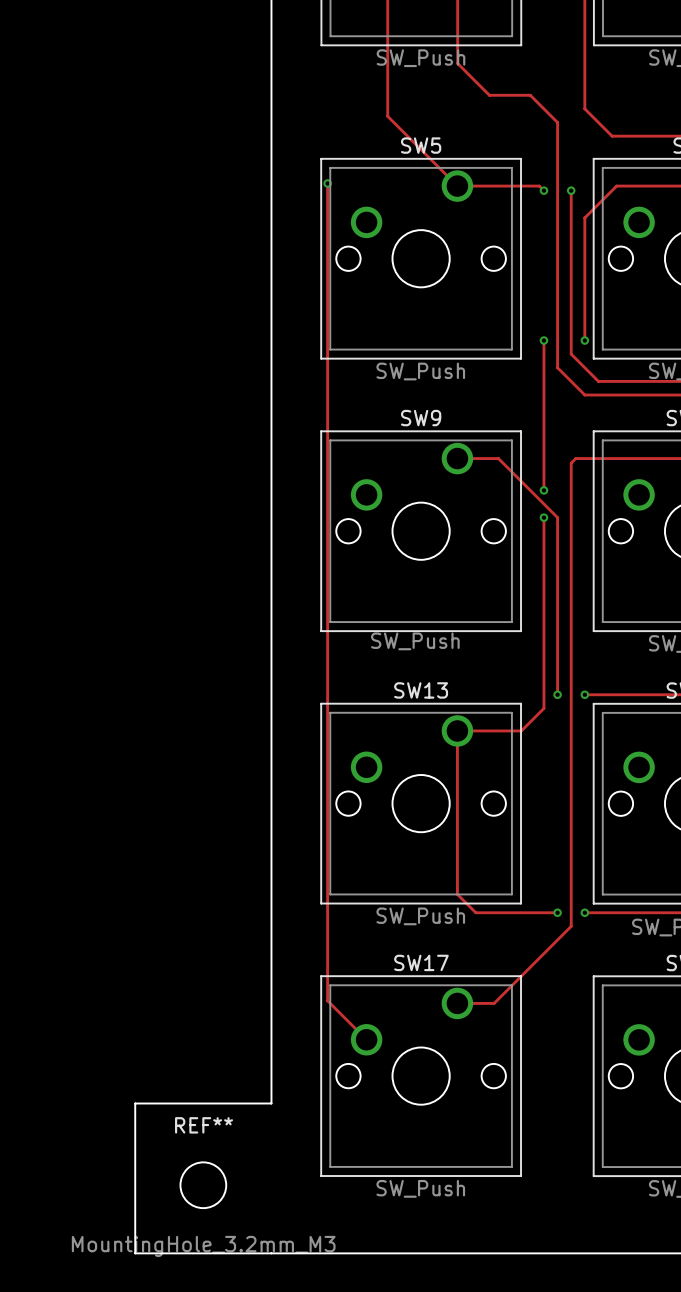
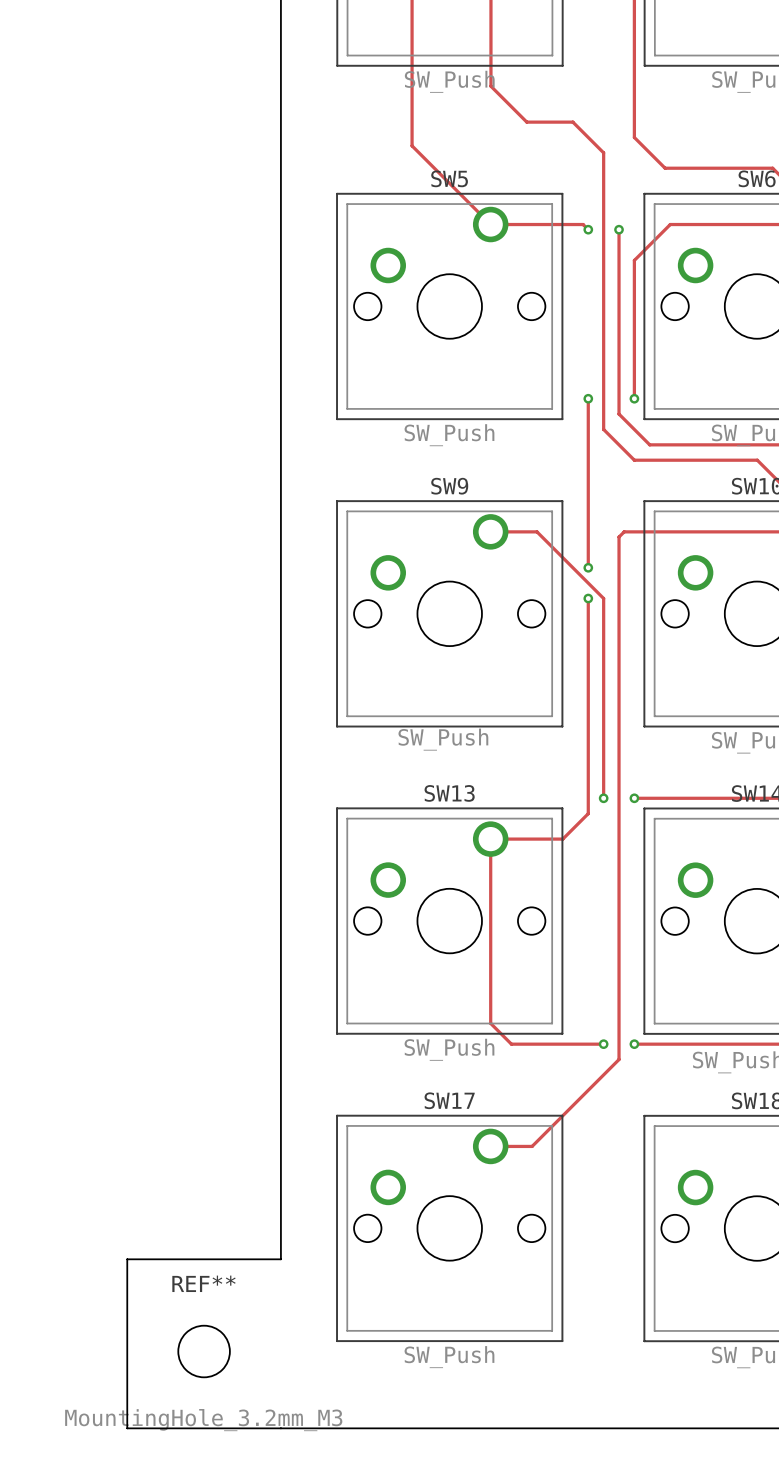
track: (327, 183) (327, 1000) (366, 1039) -> none
via: (327, 183) -> none

